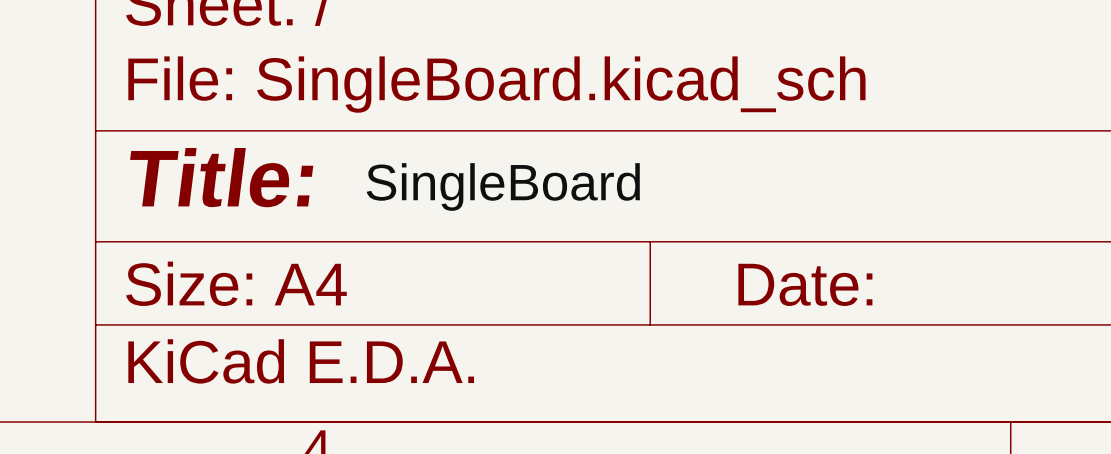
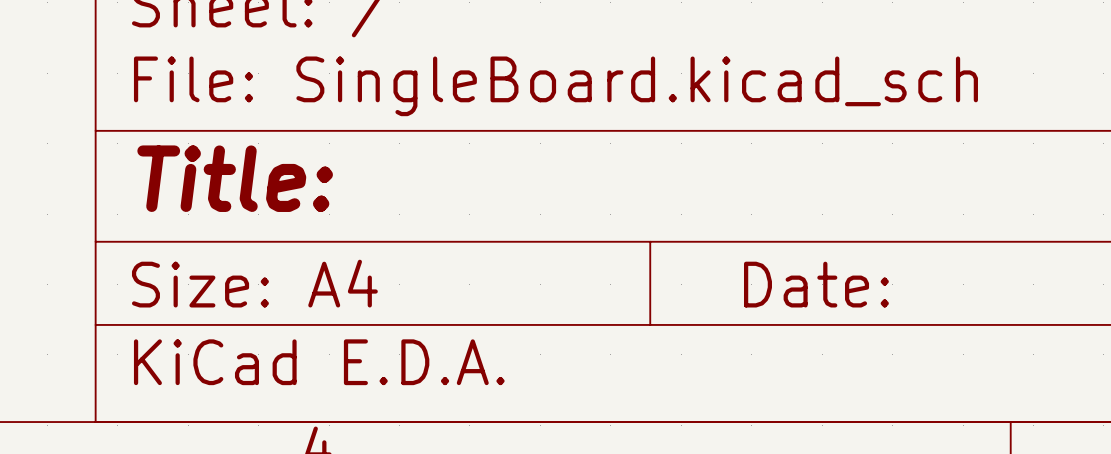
label: SingleBoard (503, 186) -> none

